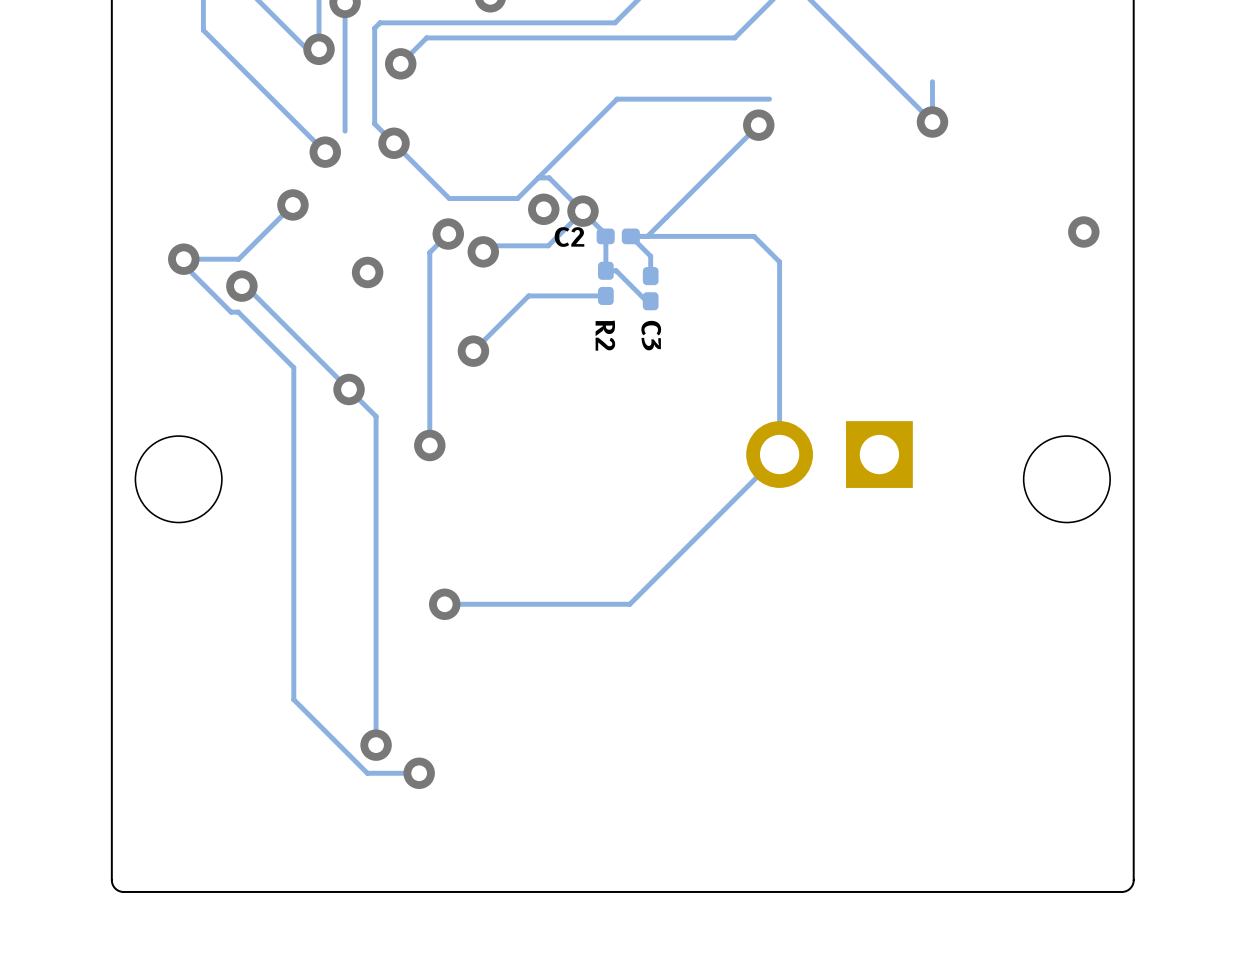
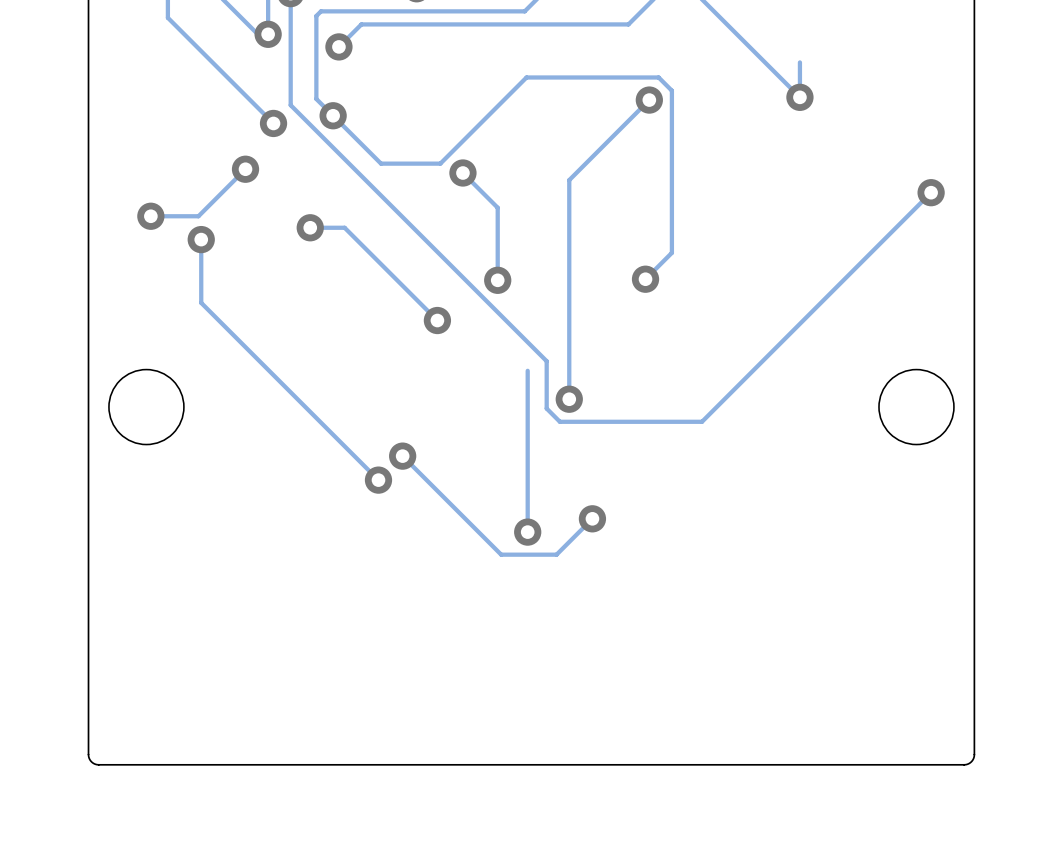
track: none -> (658, 77) (671, 90) (671, 252) (645, 279)
track: none -> (290, 105) (546, 361) (546, 408) (559, 421) (701, 421) (931, 192)
track: (538, 177) (549, 177) (605, 236) -> none
track: none -> (462, 172) (497, 207) (497, 280)
track: (583, 211) (548, 245) (491, 245) -> none
via: (583, 211) -> none
track: (666, 217) (647, 236) -> (569, 180) (569, 399)
track: (448, 234) (429, 252) (429, 445) -> none
via: (448, 234) -> none
track: (605, 236) (605, 270) (616, 270) (646, 301) (650, 301) -> none
C2: (618, 236) -> none
via: (483, 251) -> none
track: (183, 259) (183, 264) (231, 312) (238, 312) (293, 367) (293, 699) (367, 773) (419, 773) -> none
track: none -> (310, 227) (344, 227) (437, 320)
track: (650, 276) (650, 256) (630, 236) (754, 236) (779, 261) (779, 454) (629, 604) (444, 604) -> none
R2: (605, 283) -> none
track: (241, 286) (245, 286) (376, 416) (376, 745) -> (201, 239) (201, 302) (378, 480)
C3: (650, 288) -> none
track: (605, 295) (528, 295) (473, 351) -> none
via: none -> (645, 279)
via: none -> (497, 280)
via position: (473, 351) -> (437, 320)
via: (349, 389) -> none
track: none -> (527, 370) (527, 532)
via: (429, 445) -> none
part: (829, 454) -> none
via: none -> (569, 399)
track: none -> (402, 456) (501, 554) (556, 554) (592, 518)
via: none -> (402, 456)
via: none -> (378, 480)
via: (444, 604) -> none
via: none -> (592, 518)
via: none -> (527, 532)
via: (376, 745) -> none
via: (419, 773) -> none

